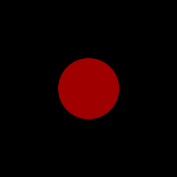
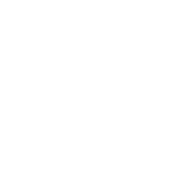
part: (88, 88) -> none

